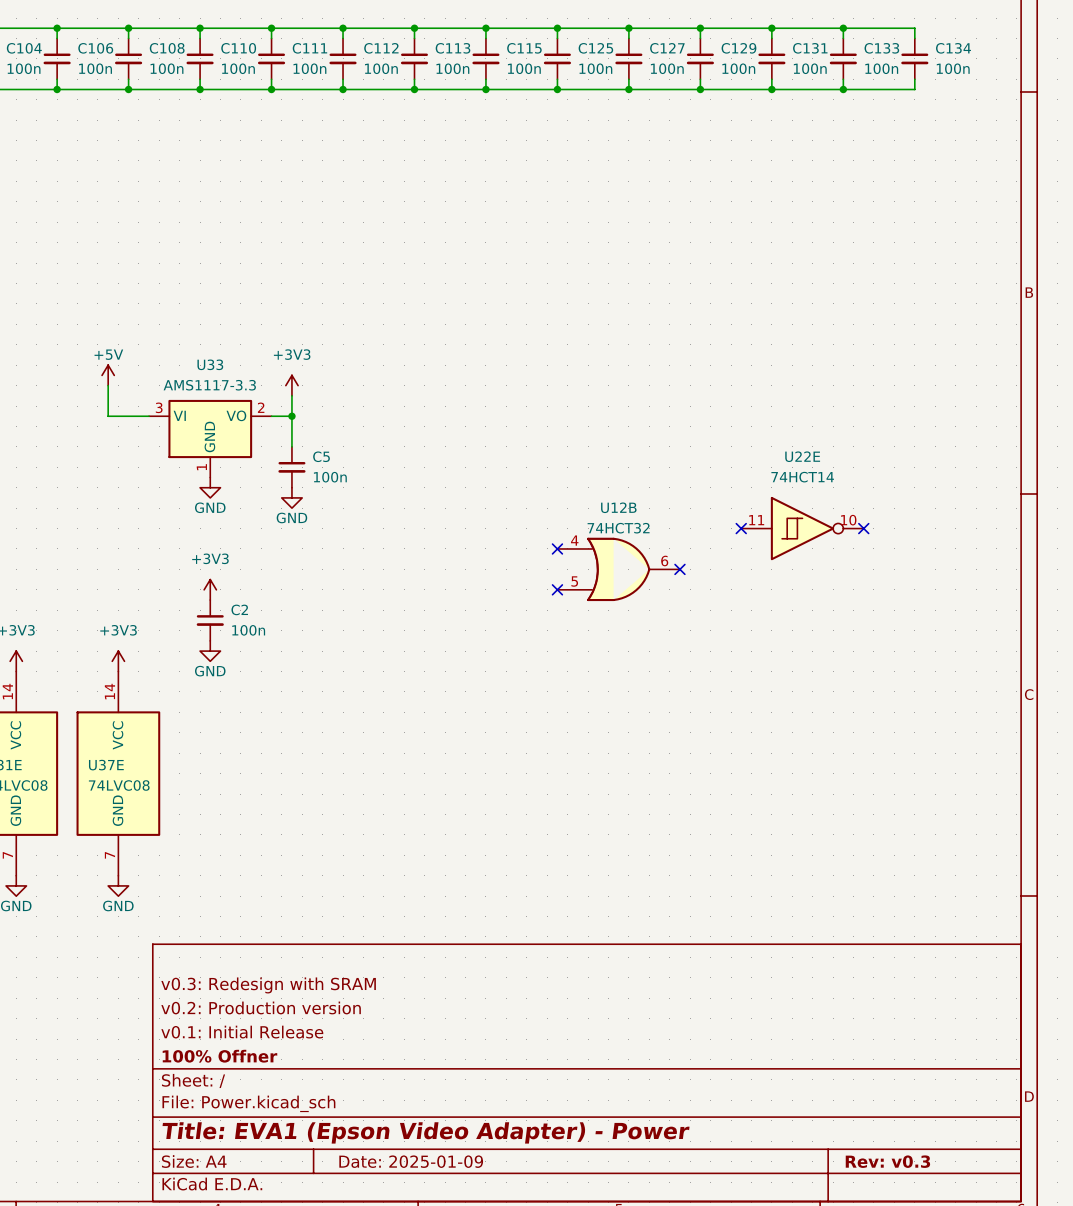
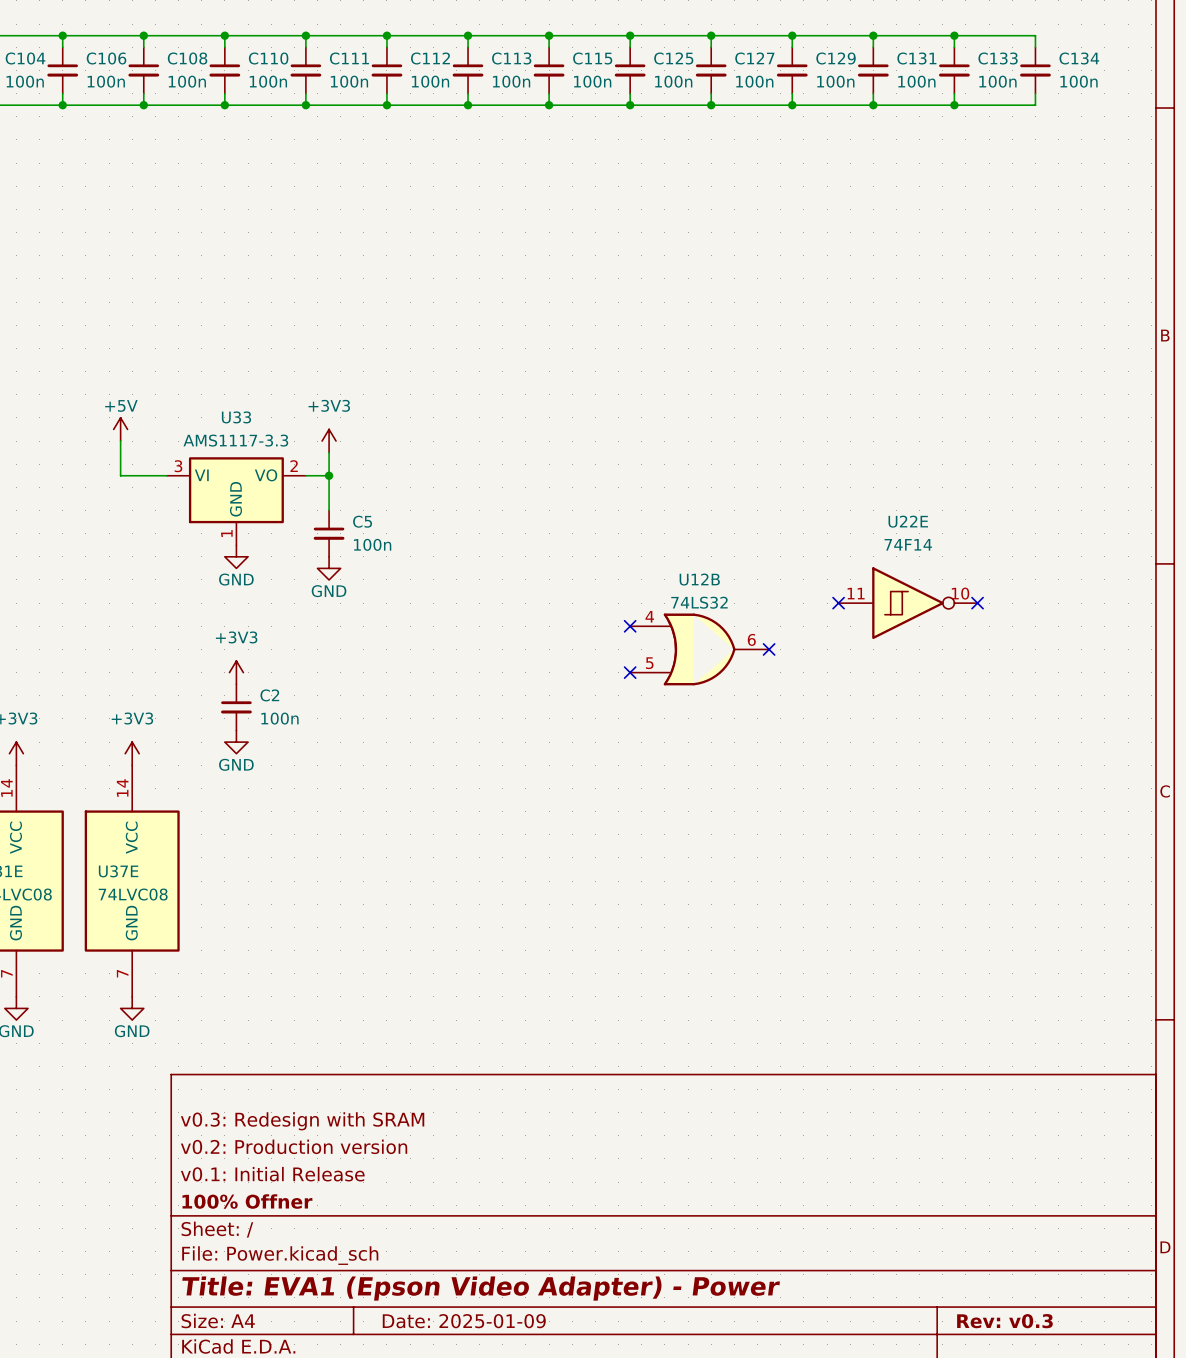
U22E value: 74HCT14 (802, 477) -> 74F14 (908, 544)
U12B value: 74HCT32 (618, 528) -> 74LS32 (699, 602)

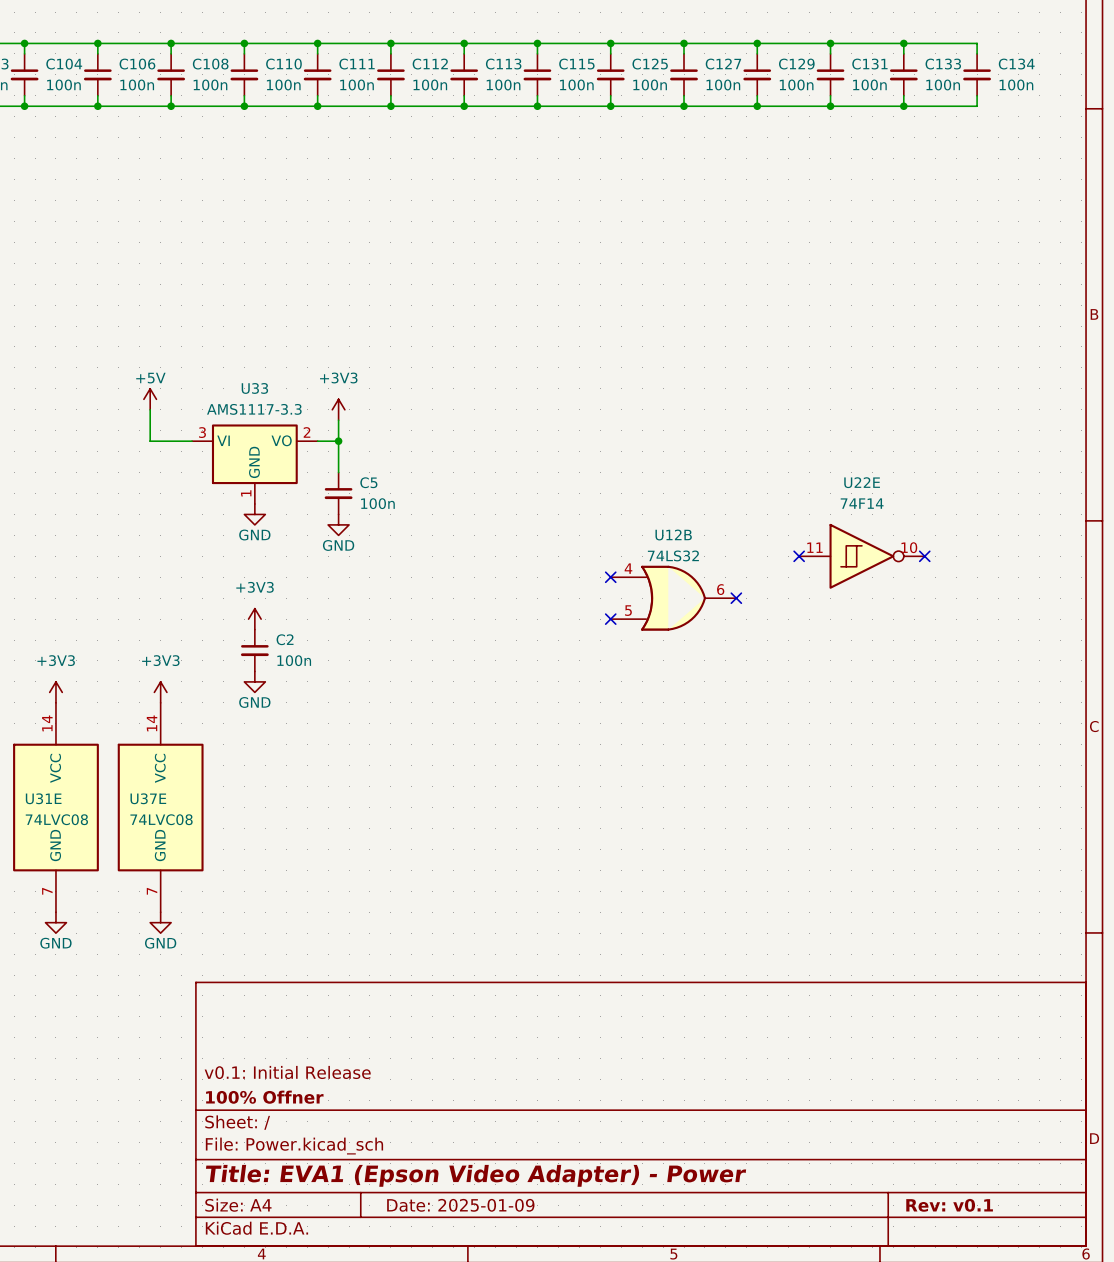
title block: v0.3: Redesign with SRAM (302, 1121) -> none
title block: v0.2: Production version (294, 1146) -> none
title block: Rev: v0.3 (1004, 1321) -> Rev: v0.1 (949, 1205)

